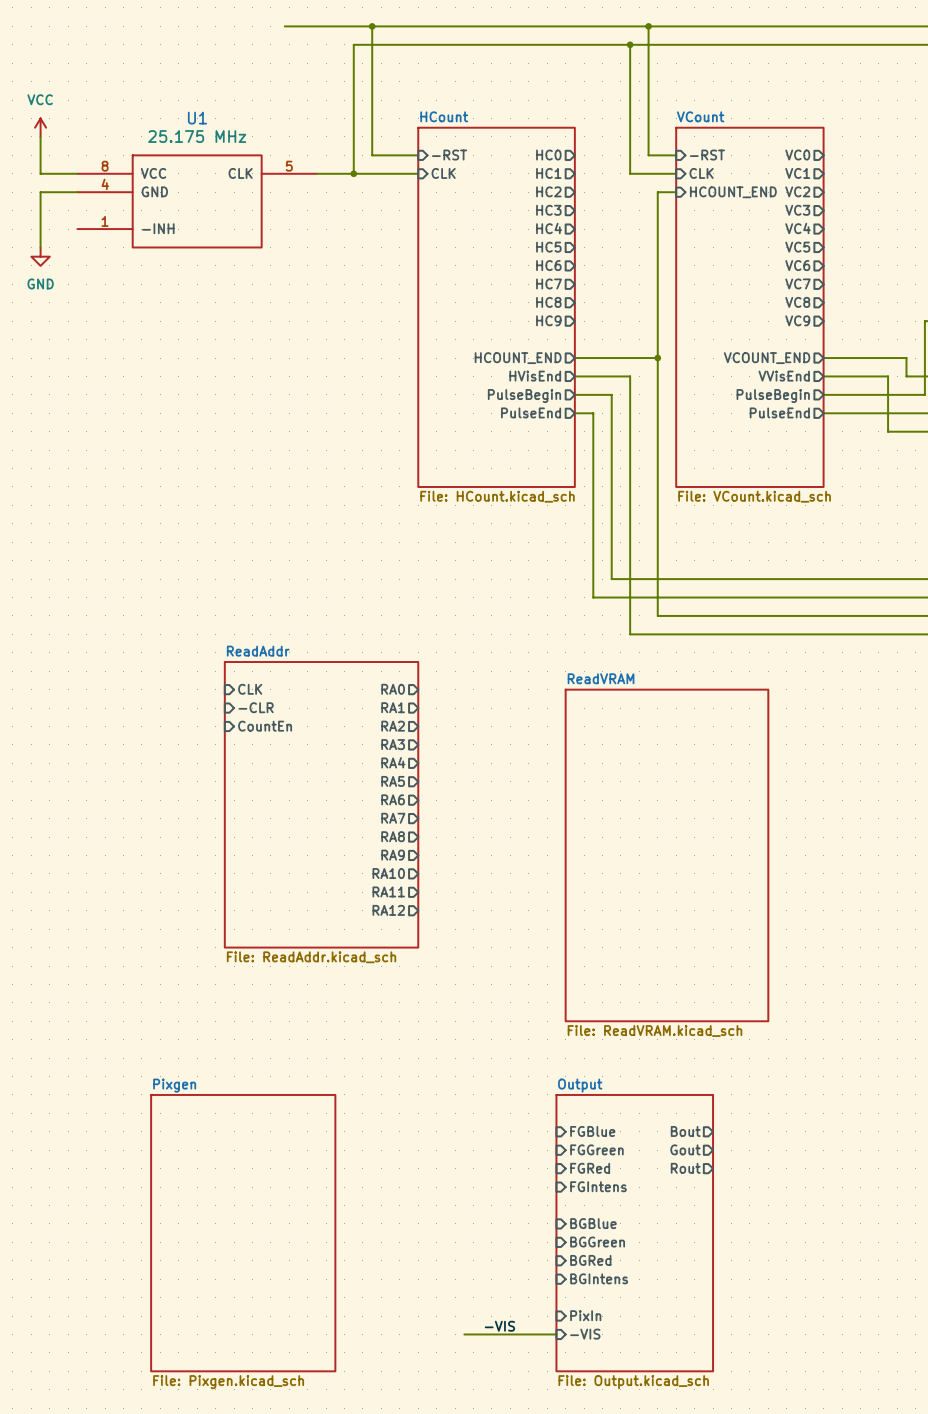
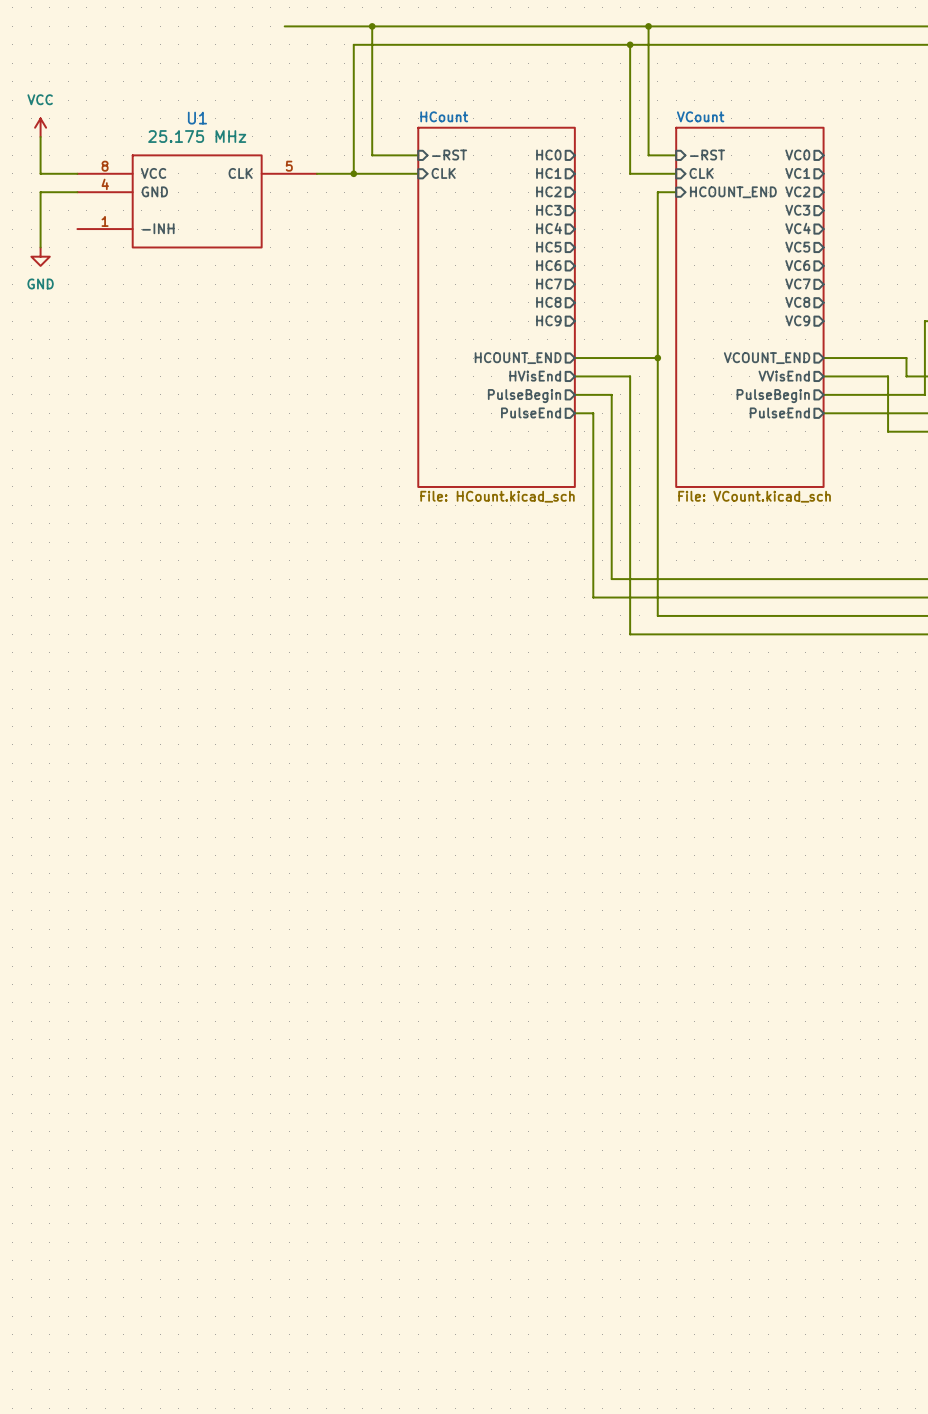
sheet pin: CLK (250, 689) -> none
sheet pin: RA0 (393, 689) -> none
sheet pin: -CLR (256, 707) -> none
sheet pin: RA1 (393, 707) -> none
sheet pin: CountEn (265, 726) -> none
sheet pin: RA2 (393, 726) -> none
sheet pin: RA3 (393, 744) -> none
sheet pin: RA4 (393, 762) -> none
sheet pin: RA5 (393, 781) -> none
sheet pin: RA6 (393, 799) -> none
sheet ReadAddr: File: ReadAddr.kicad_sch (321, 804) -> none
sheet pin: RA7 (393, 818) -> none
sheet pin: RA8 (393, 836) -> none
sheet pin: RA9 (393, 855) -> none
sheet ReadVRAM: File: ReadVRAM.kicad_sch (666, 855) -> none
sheet pin: RA10 (388, 873) -> none
sheet pin: RA11 (388, 891) -> none
sheet pin: RA12 (388, 910) -> none
sheet pin: FGBlue (592, 1131) -> none
sheet pin: Bout (685, 1131) -> none
sheet pin: FGGreen (596, 1149) -> none
sheet pin: Gout (685, 1149) -> none
sheet pin: FGRed (590, 1168) -> none
sheet pin: Rout (685, 1168) -> none
sheet pin: FGIntens (598, 1186) -> none
sheet pin: BGBlue (593, 1223) -> none
sheet Pixgen: File: Pixgen.kicad_sch (243, 1233) -> none
sheet Output: File: Output.kicad_sch (634, 1233) -> none
sheet pin: BGGreen (597, 1242) -> none
sheet pin: BGRed (590, 1260) -> none
sheet pin: BGIntens (599, 1278) -> none
sheet pin: PixIn (585, 1315) -> none
label: -VIS (499, 1326) -> none
wire: (464, 1334) (556, 1334) -> none
sheet pin: -VIS (585, 1334) -> none

